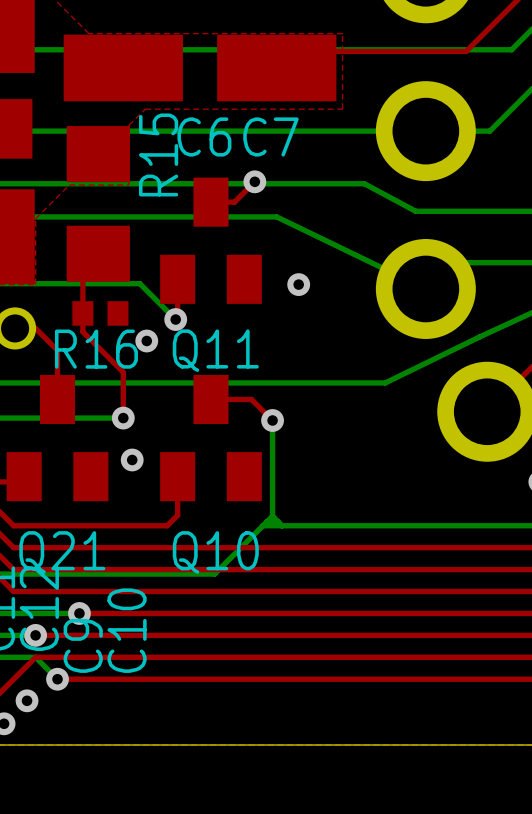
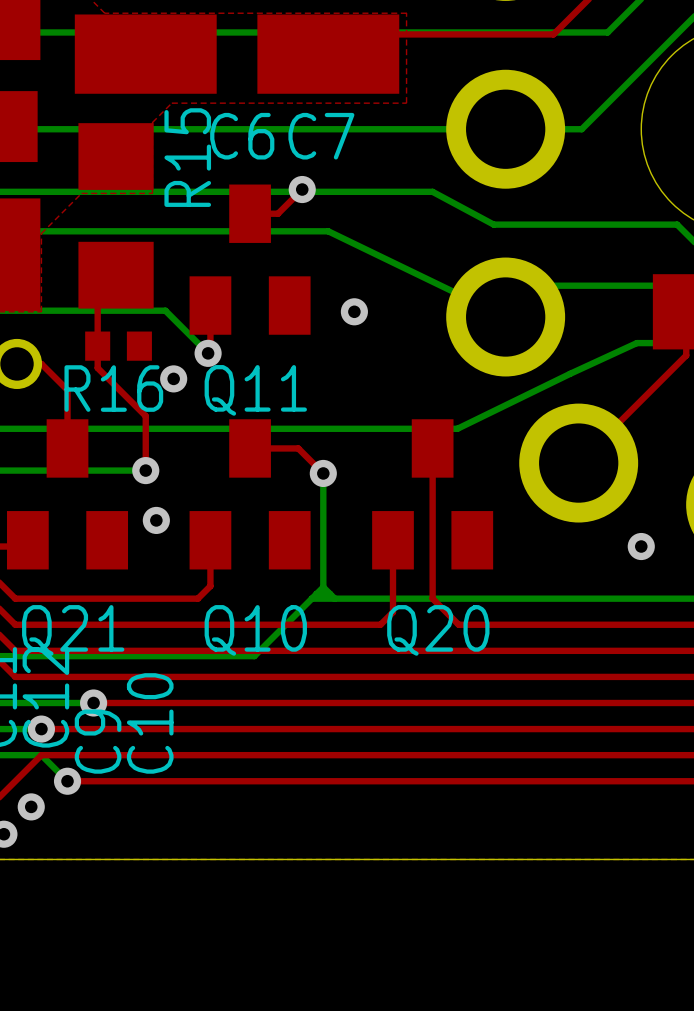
top track: none -> (432, 448) (432, 598) (458, 624)
Q20: none -> (432, 494)
top track: (320, 547) (386, 547) -> (380, 624) (392, 612) (392, 540)

